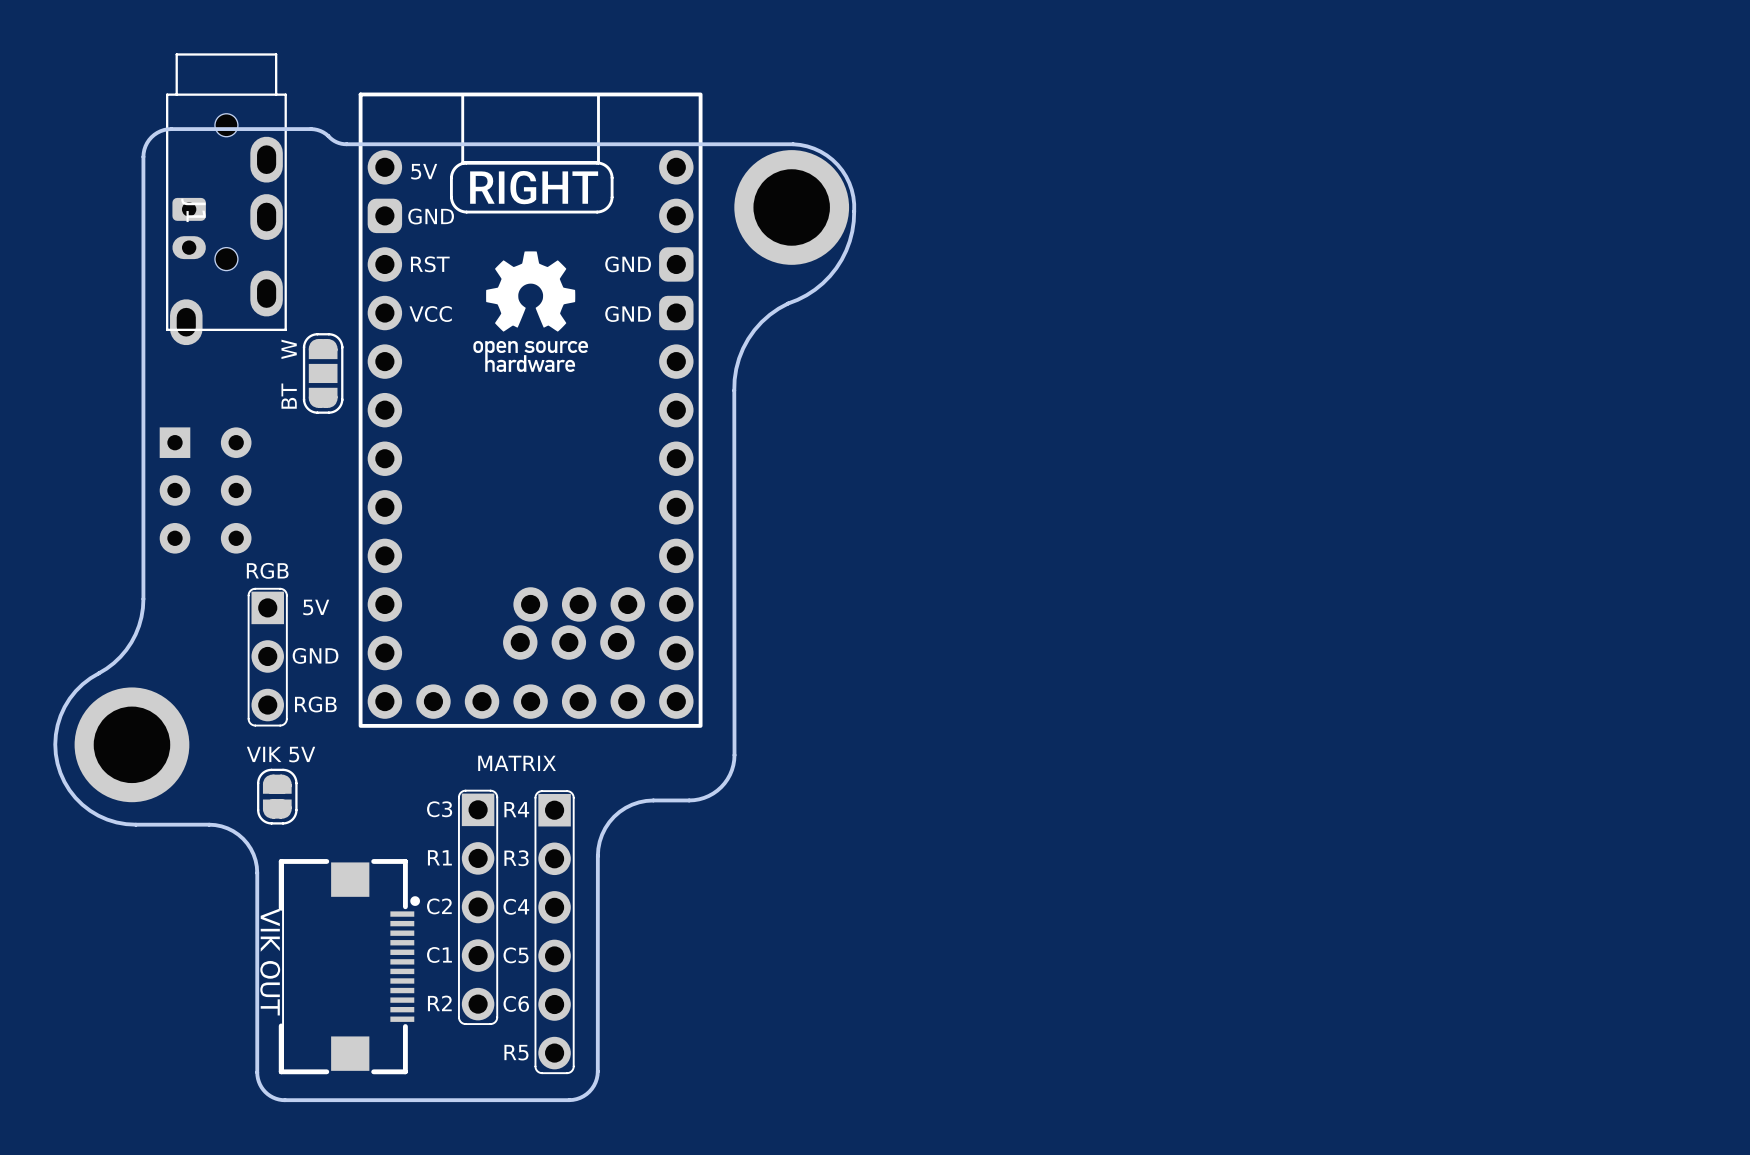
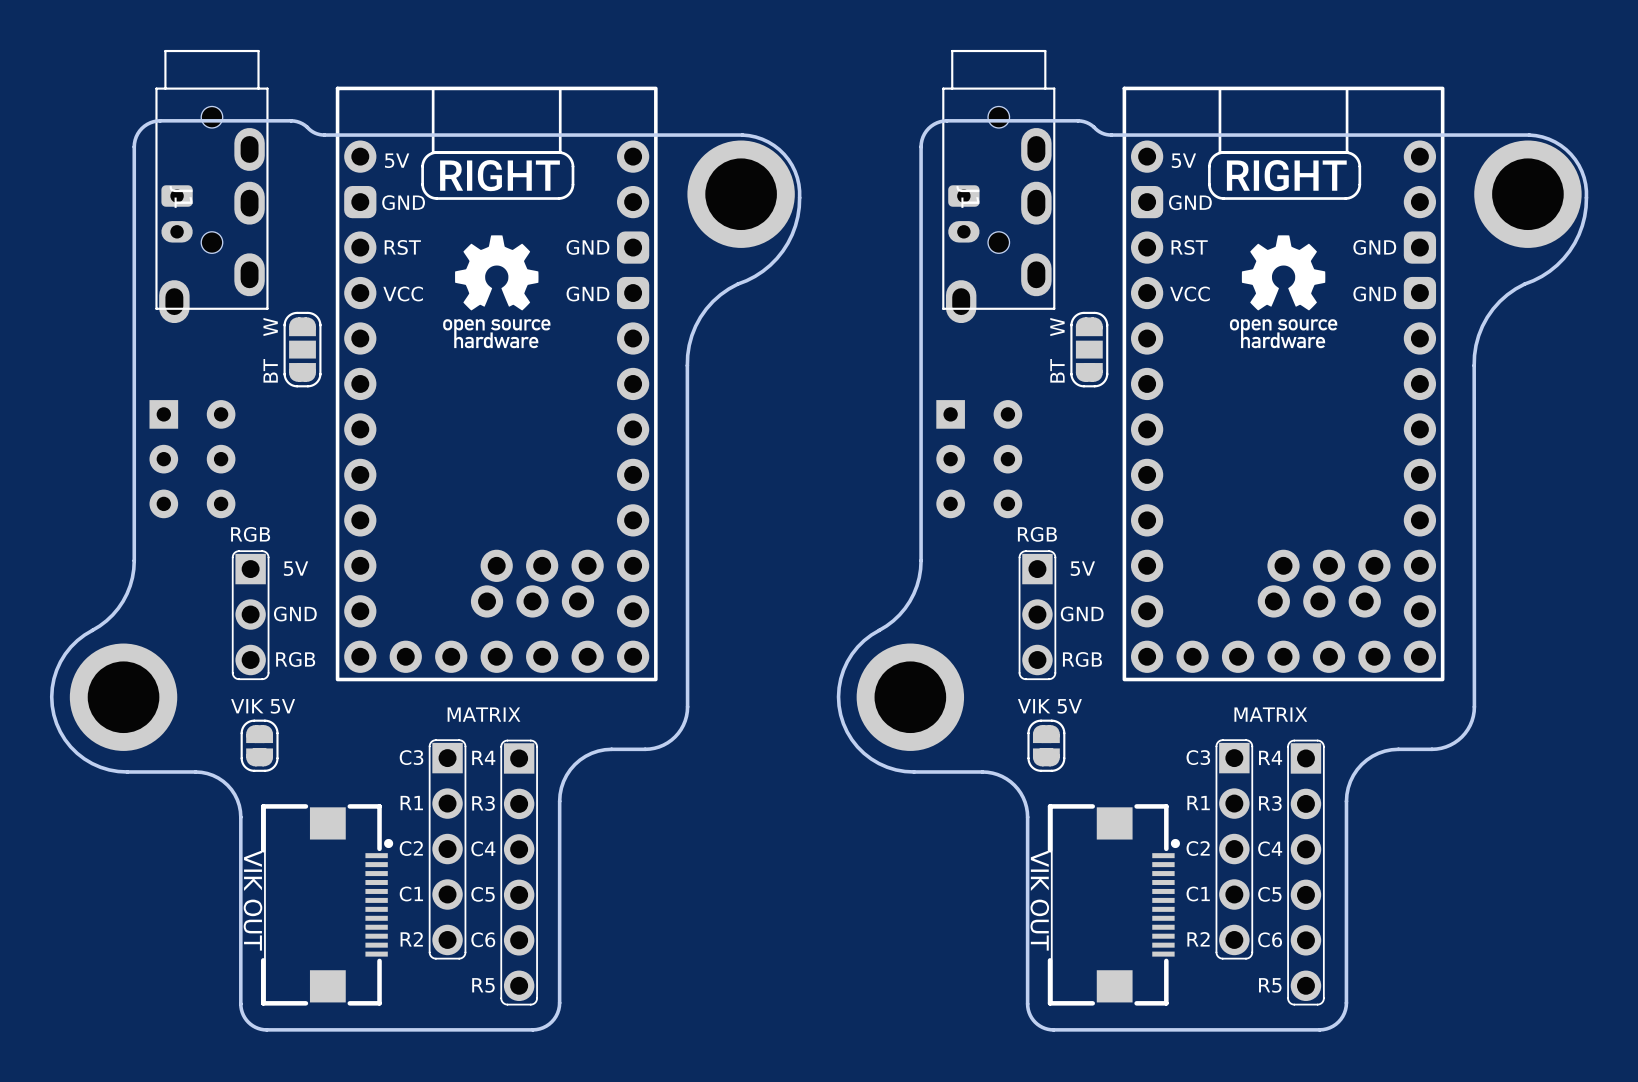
line: none -> (1223, 152) (1349, 152) (1355, 156) (1359, 162) (1359, 188) (1354, 195) (1345, 198) (1220, 198) (1213, 194) (1209, 188) (1209, 166) (1213, 156) (1223, 152)
drawing: none -> [1226, 160, 1347, 192]
part: none -> (998, 186)
part: none -> (1527, 194)
part: none -> (963, 213)
drawing: none -> [1229, 235, 1338, 349]
part: none -> (1089, 349)
part: none -> (1283, 383)
part: none -> (979, 459)
text: none -> RGB (1037, 534)
part: none -> (1037, 615)
part: none -> (910, 697)
text: none -> VIK 5V (1049, 706)
text: none -> MATRIX (1270, 714)
part: none -> (1046, 745)
part: none -> (1234, 849)
part: none -> (1305, 872)
part: none -> (1113, 904)
board edge: none -> (1053, 1029) (1319, 1029) (1333, 1026) (1342, 1016) (1346, 1002) (1346, 801) (1350, 781) (1361, 764) (1378, 753) (1391, 749) (1436, 749) (1450, 745) (1465, 733) (1473, 716) (1474, 355) (1478, 335) (1493, 309) (1515, 288) (1541, 276) (1557, 265) (1569, 251) (1579, 234) (1586, 207) (1584, 177) (1578, 165) (1571, 154) (1555, 142) (1542, 137) (1529, 135) (1108, 134) (1099, 131) (1086, 122) (1078, 120) (943, 121) (934, 124) (924, 133) (921, 146) (920, 569) (913, 593) (905, 608) (893, 620) (864, 640) (847, 661) (839, 687) (839, 705) (843, 723) (851, 739) (863, 753) (878, 763) (904, 771) (992, 773) (1006, 778) (1020, 793) (1025, 802) (1027, 817) (1027, 1006) (1035, 1022) (1045, 1028) (1053, 1029)

